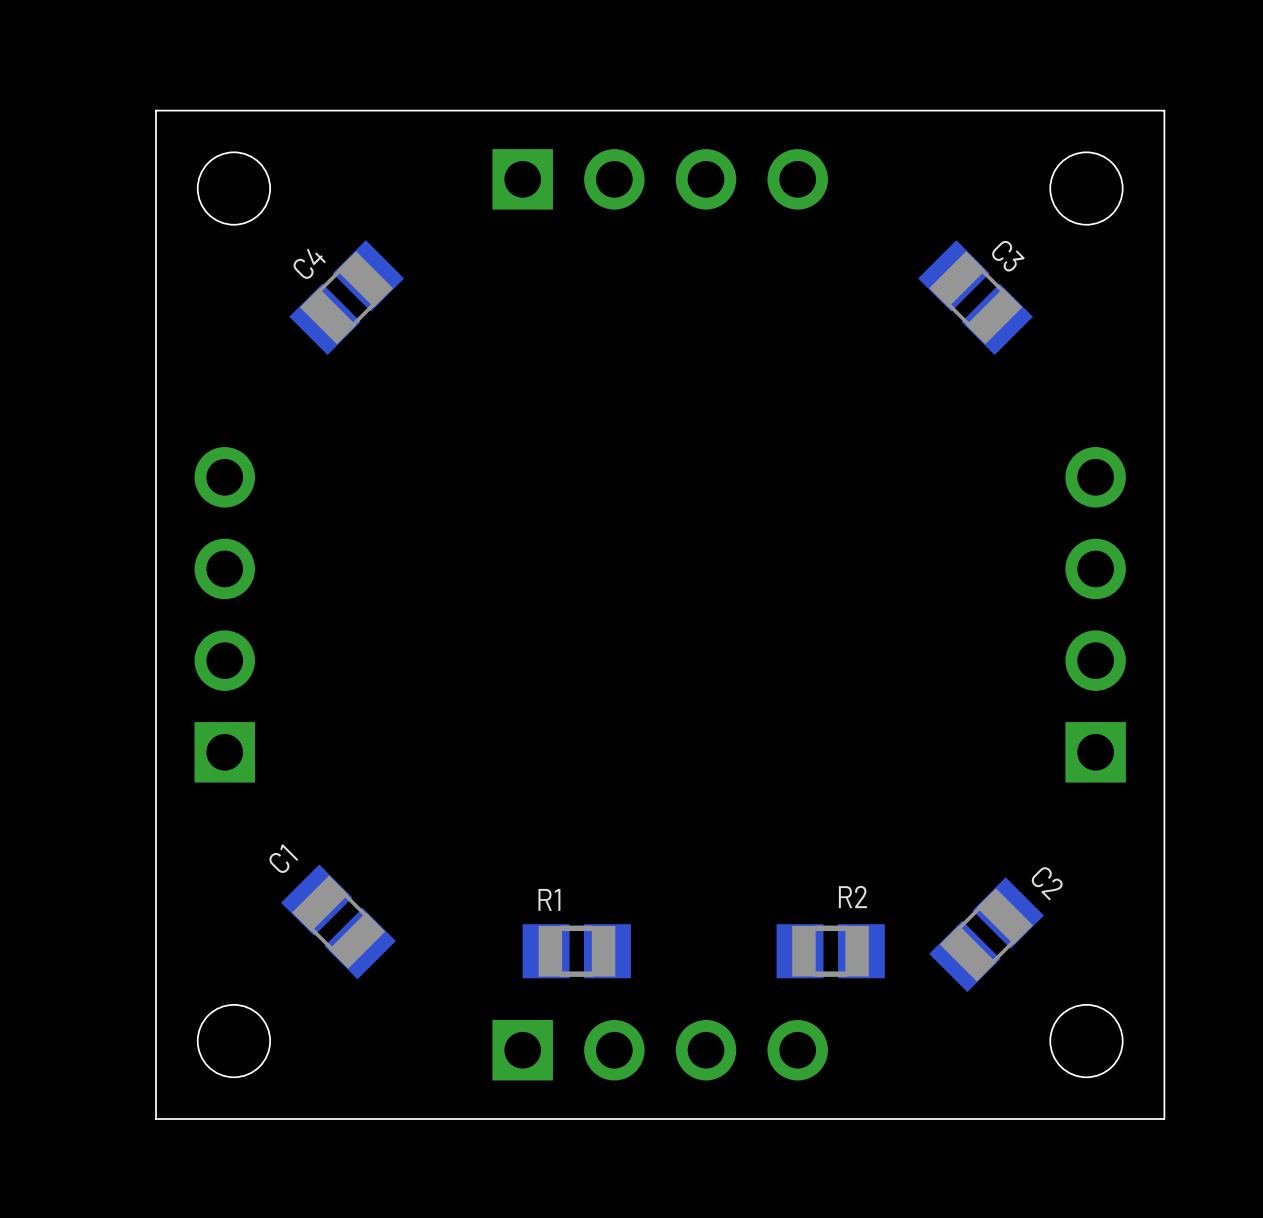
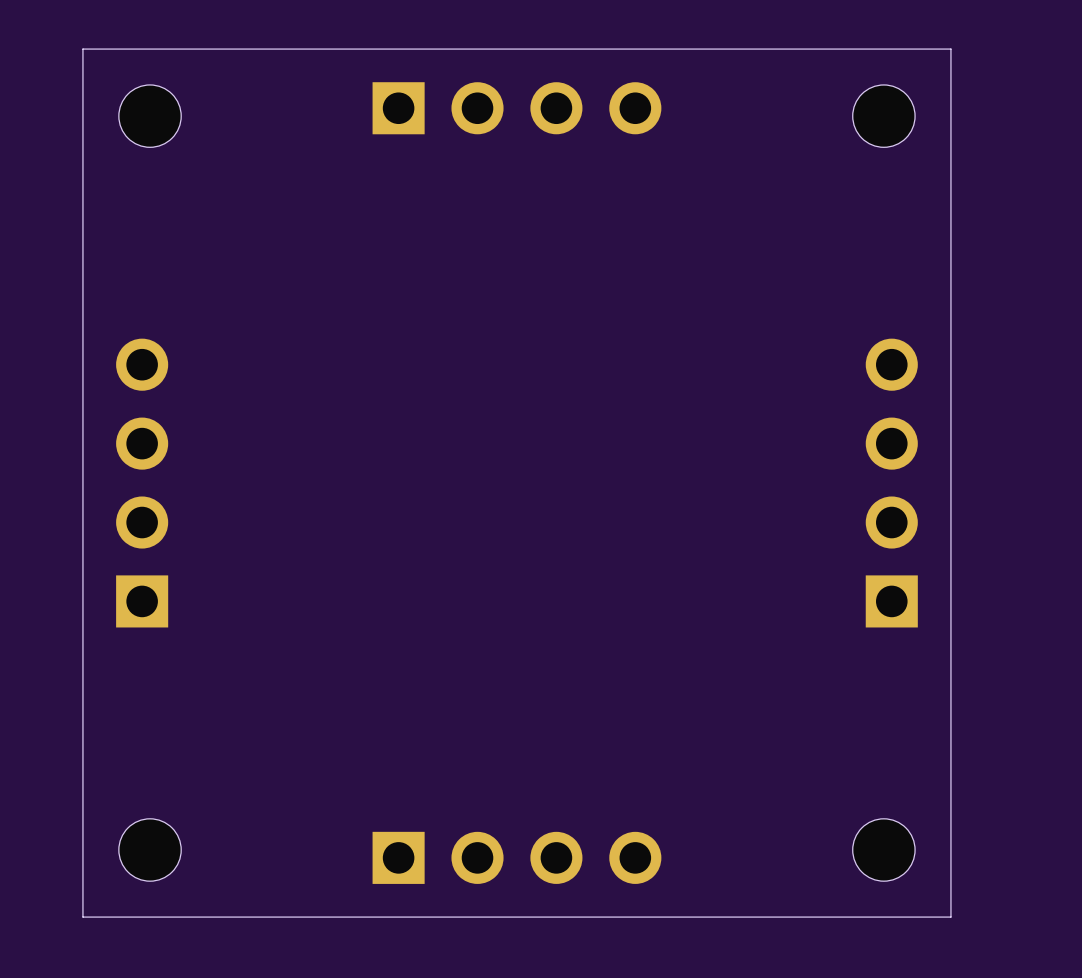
C4: (346, 297) -> none
C3: (975, 297) -> none
C1: (338, 921) -> none
C2: (986, 934) -> none
R1: (576, 951) -> none
R2: (830, 951) -> none

